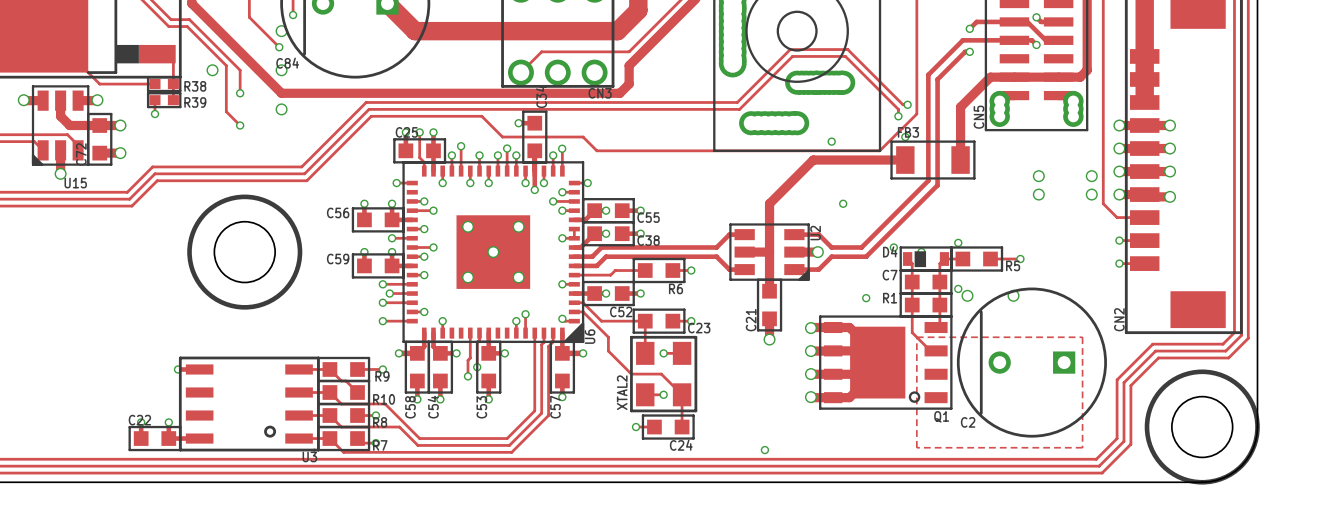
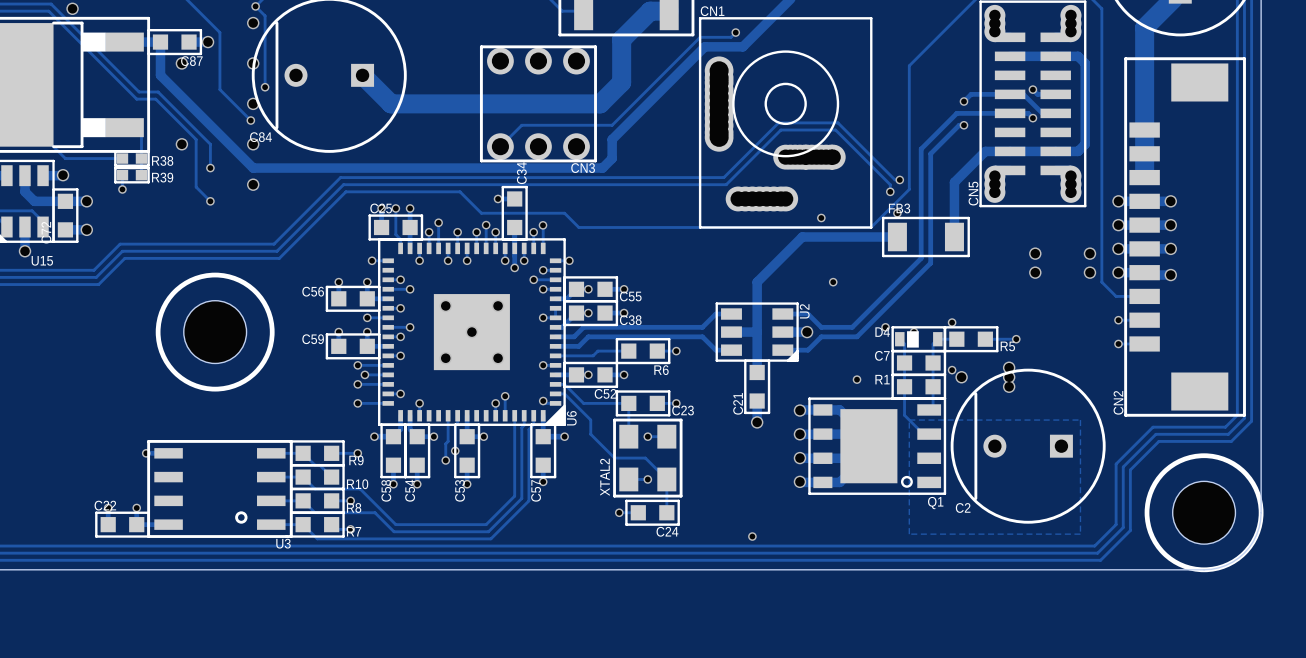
via: none -> (1009, 367)
via: none -> (1009, 386)

